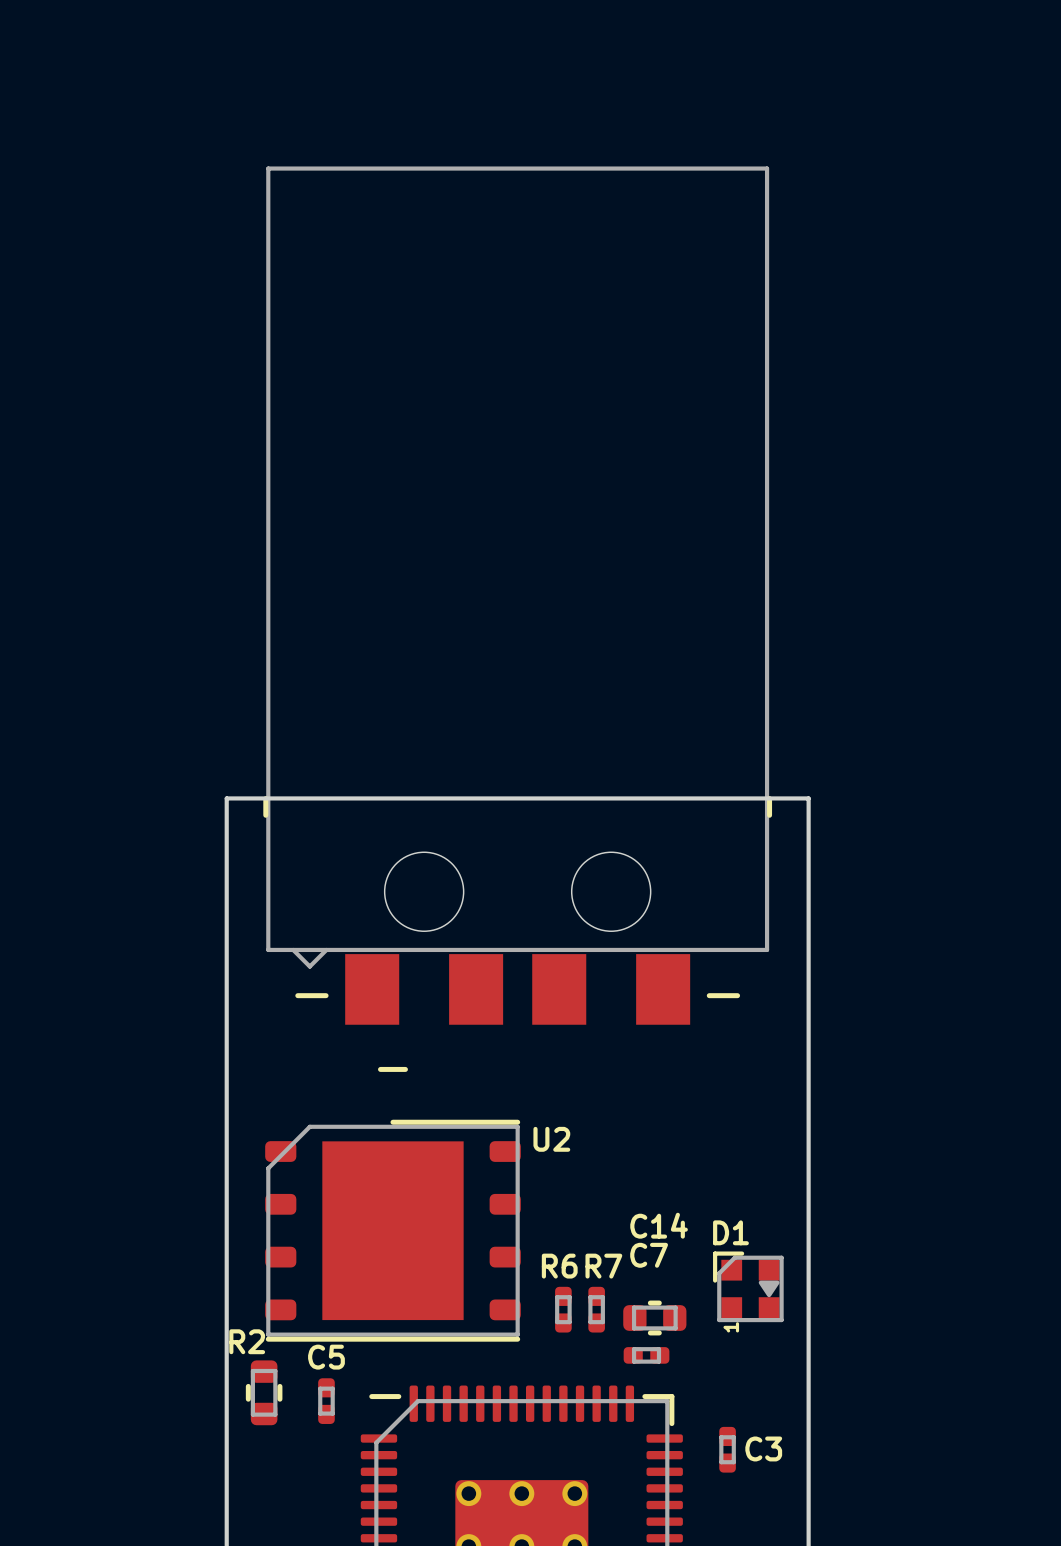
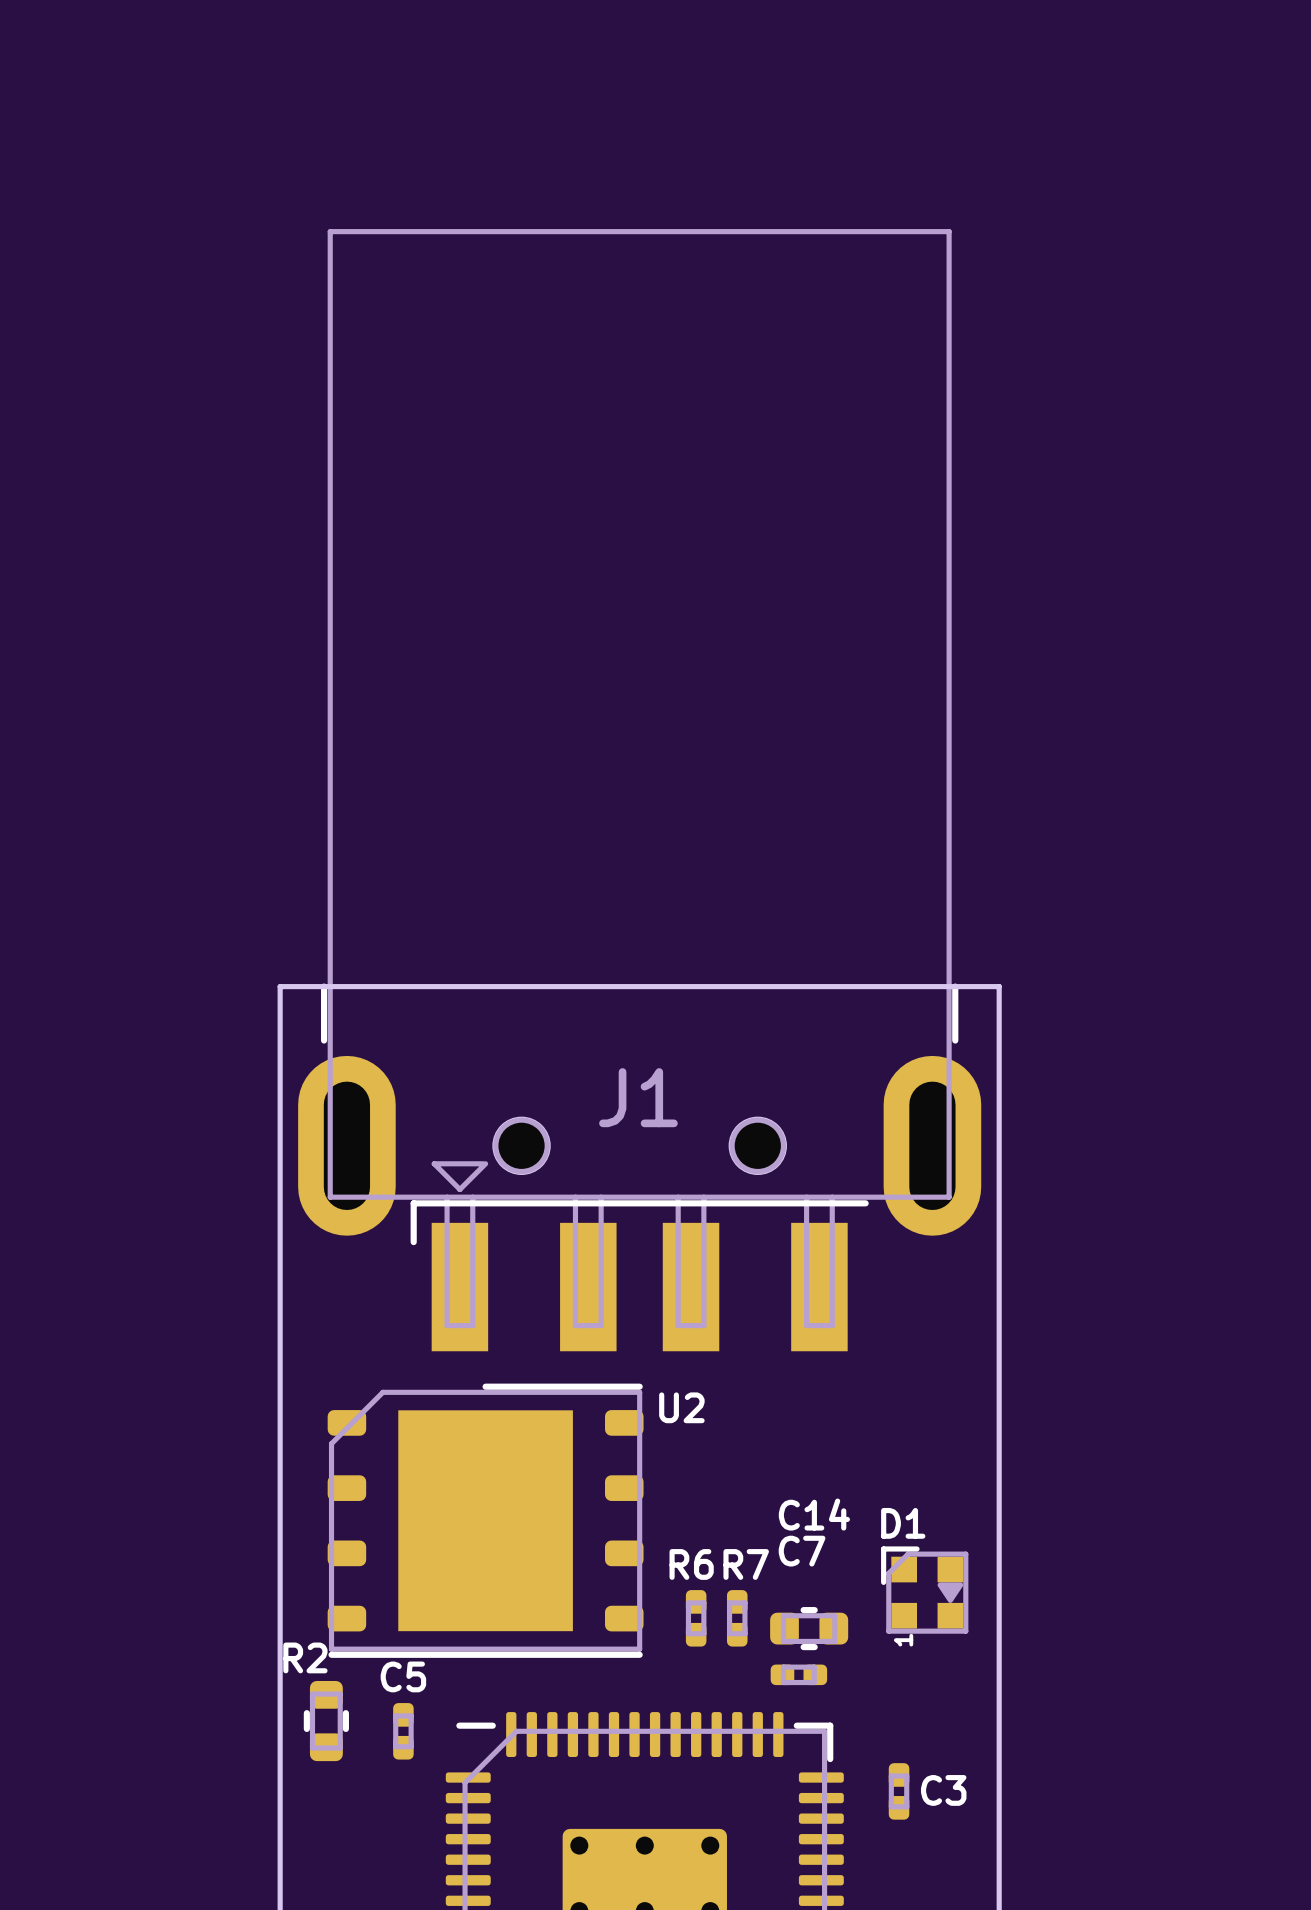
part: (517, 619) -> none
J1: none -> (639, 790)

